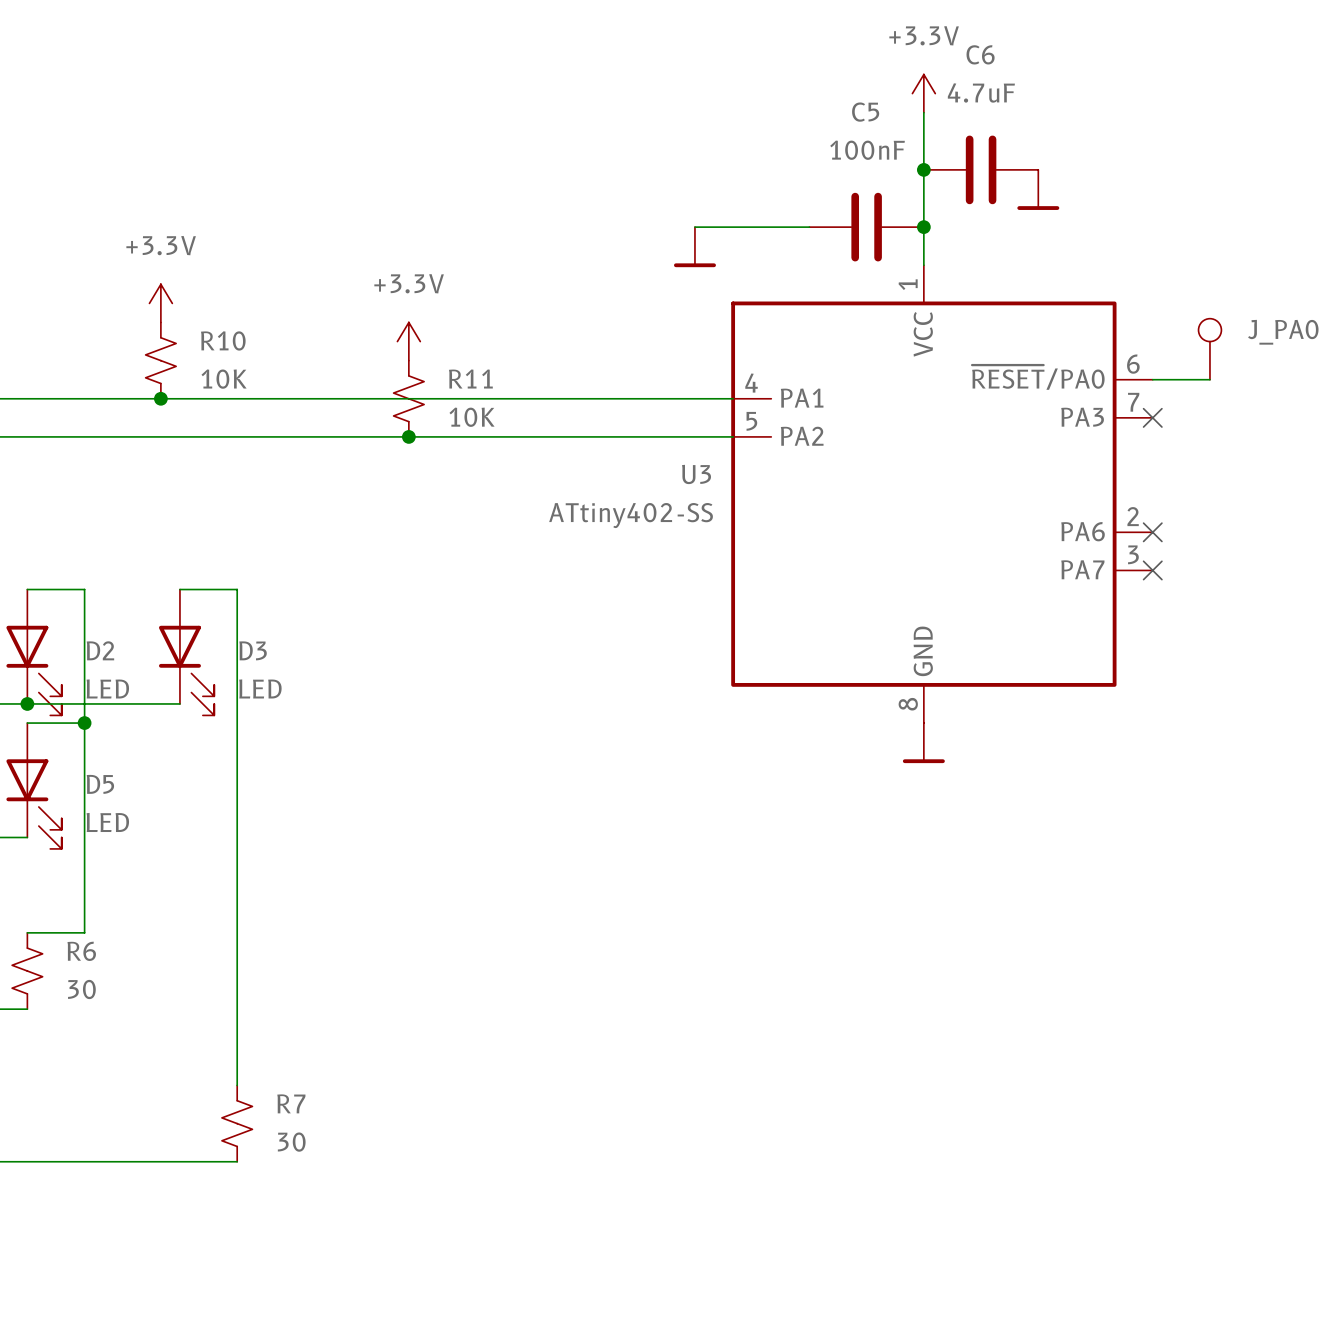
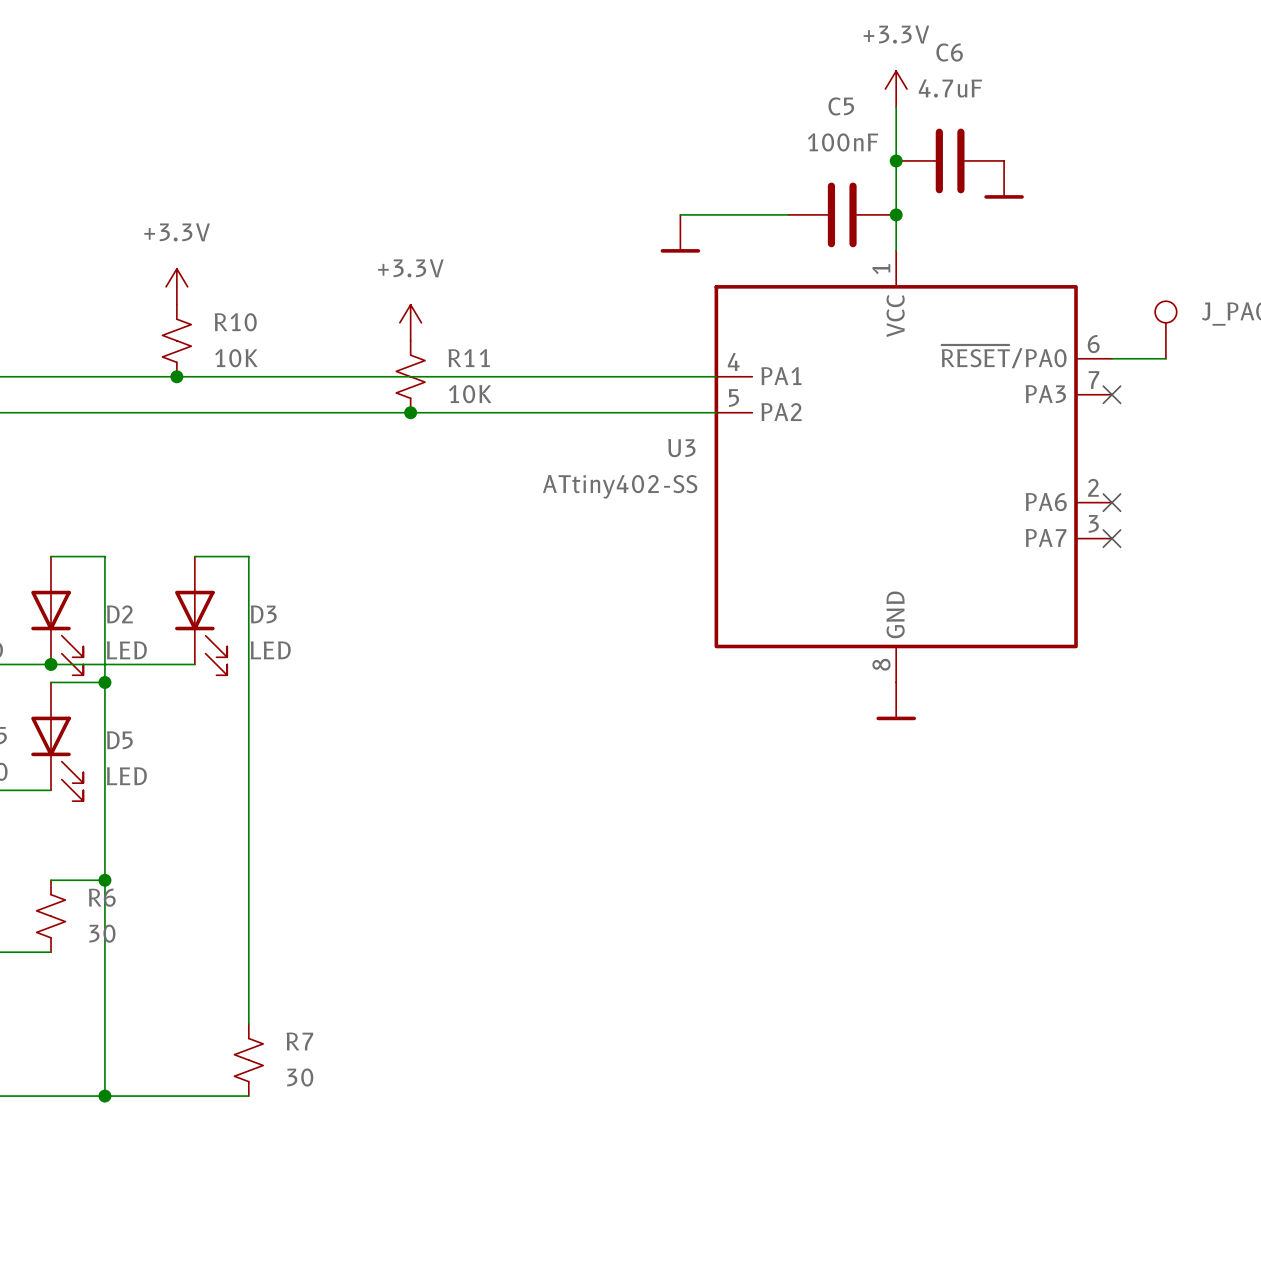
wire: none -> (104, 880) (104, 1096)
junction: none -> (104, 880)
junction: none -> (104, 1096)

